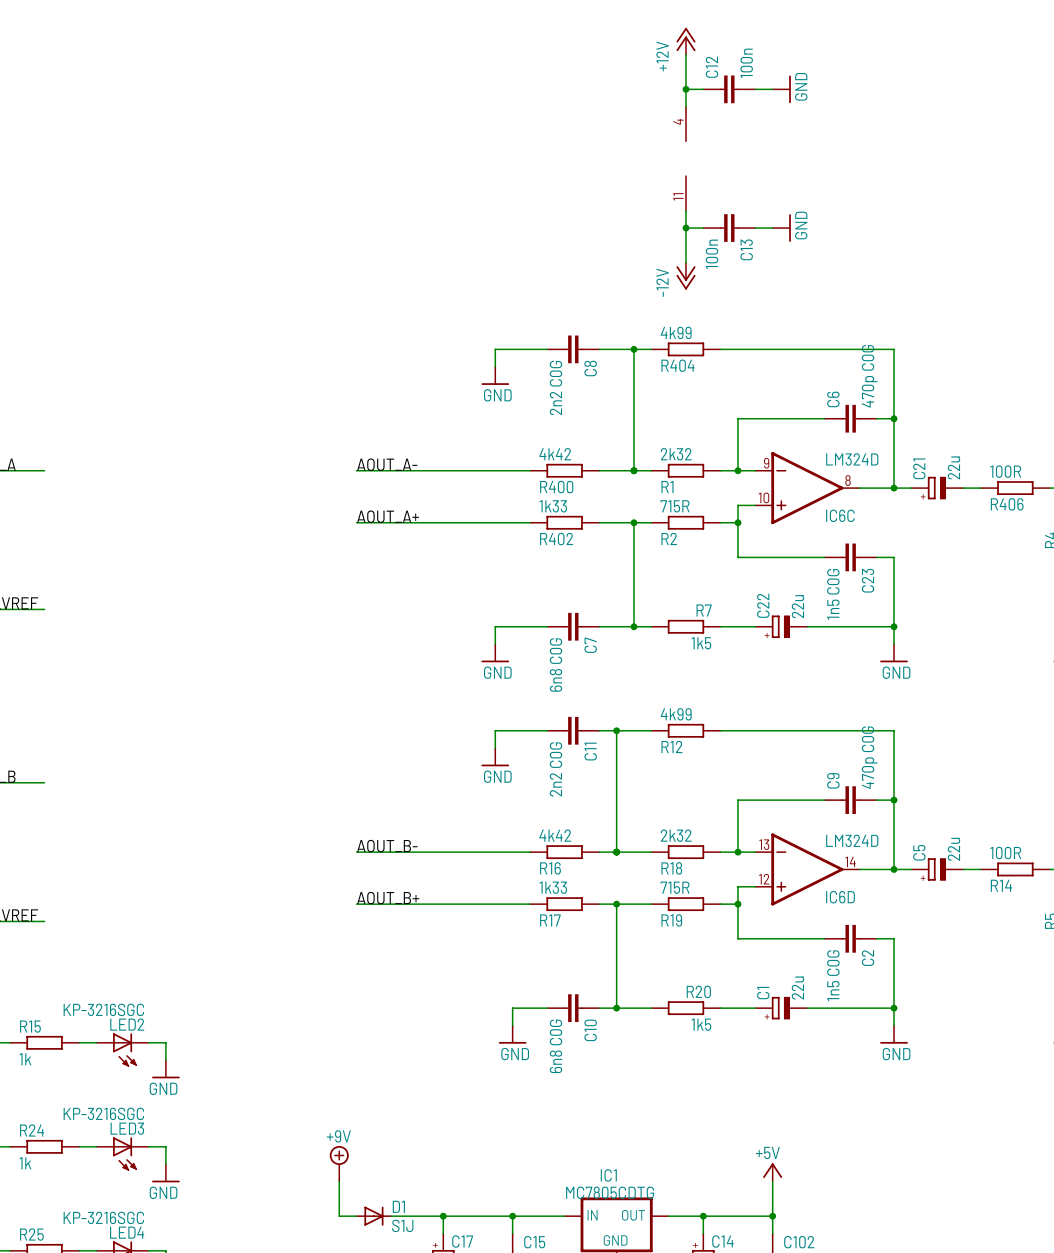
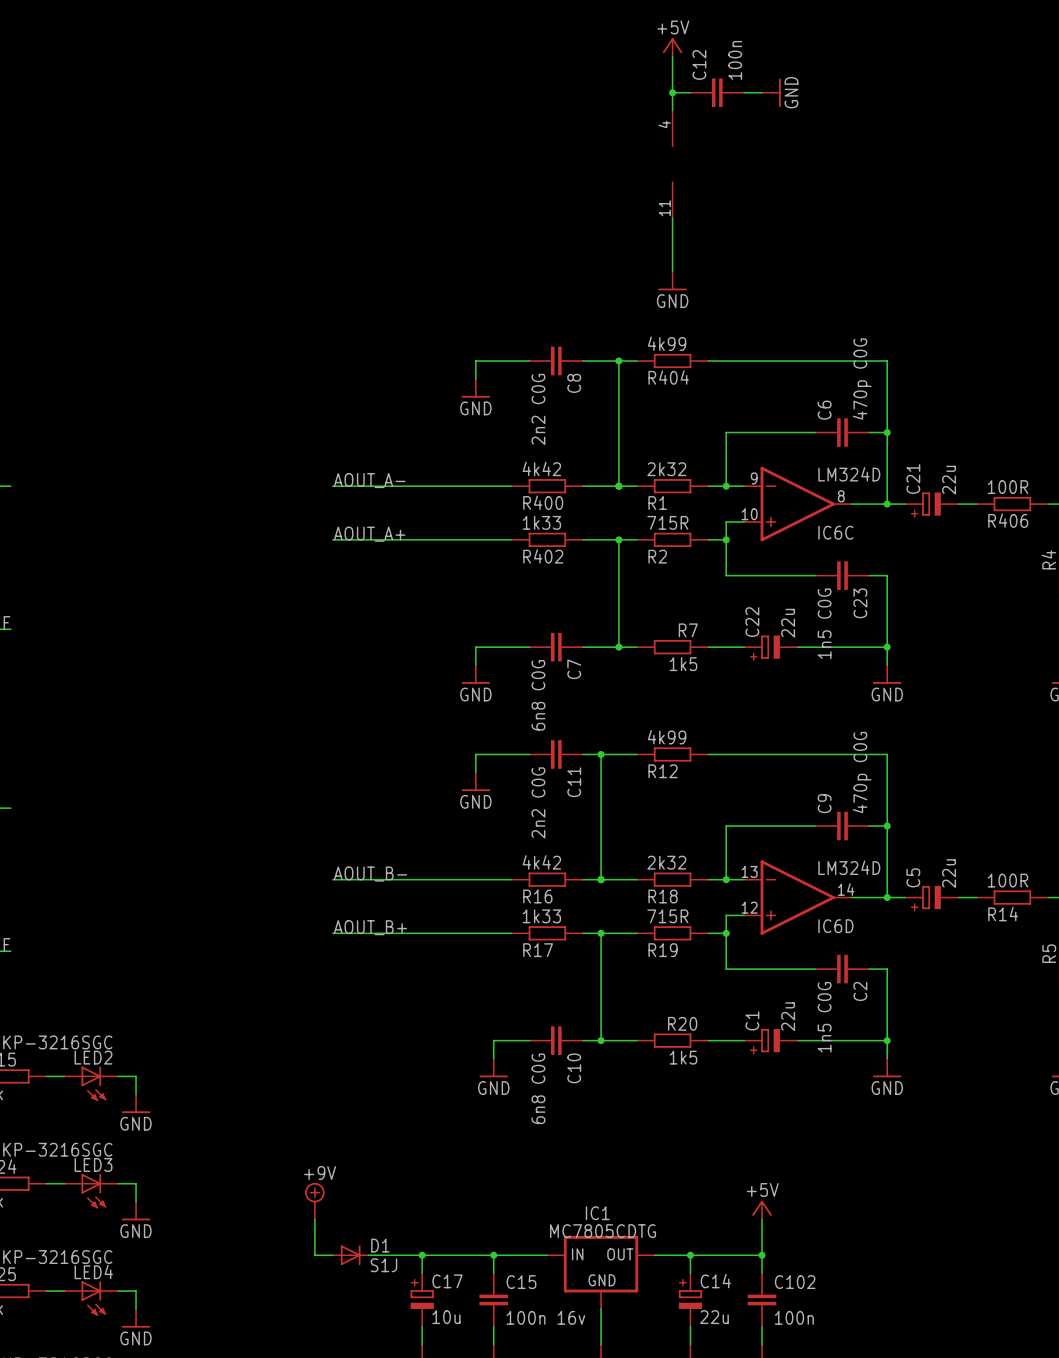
power symbol: +12V (685, 41) -> +5V (672, 47)
wire: (685, 228) (703, 228) -> none
junction: (685, 228) -> none
C13: 100n (729, 228) -> none
wire: (755, 228) (772, 228) -> none
power symbol: GND (781, 228) -> none
power symbol: -12V (685, 276) -> GND (672, 280)

